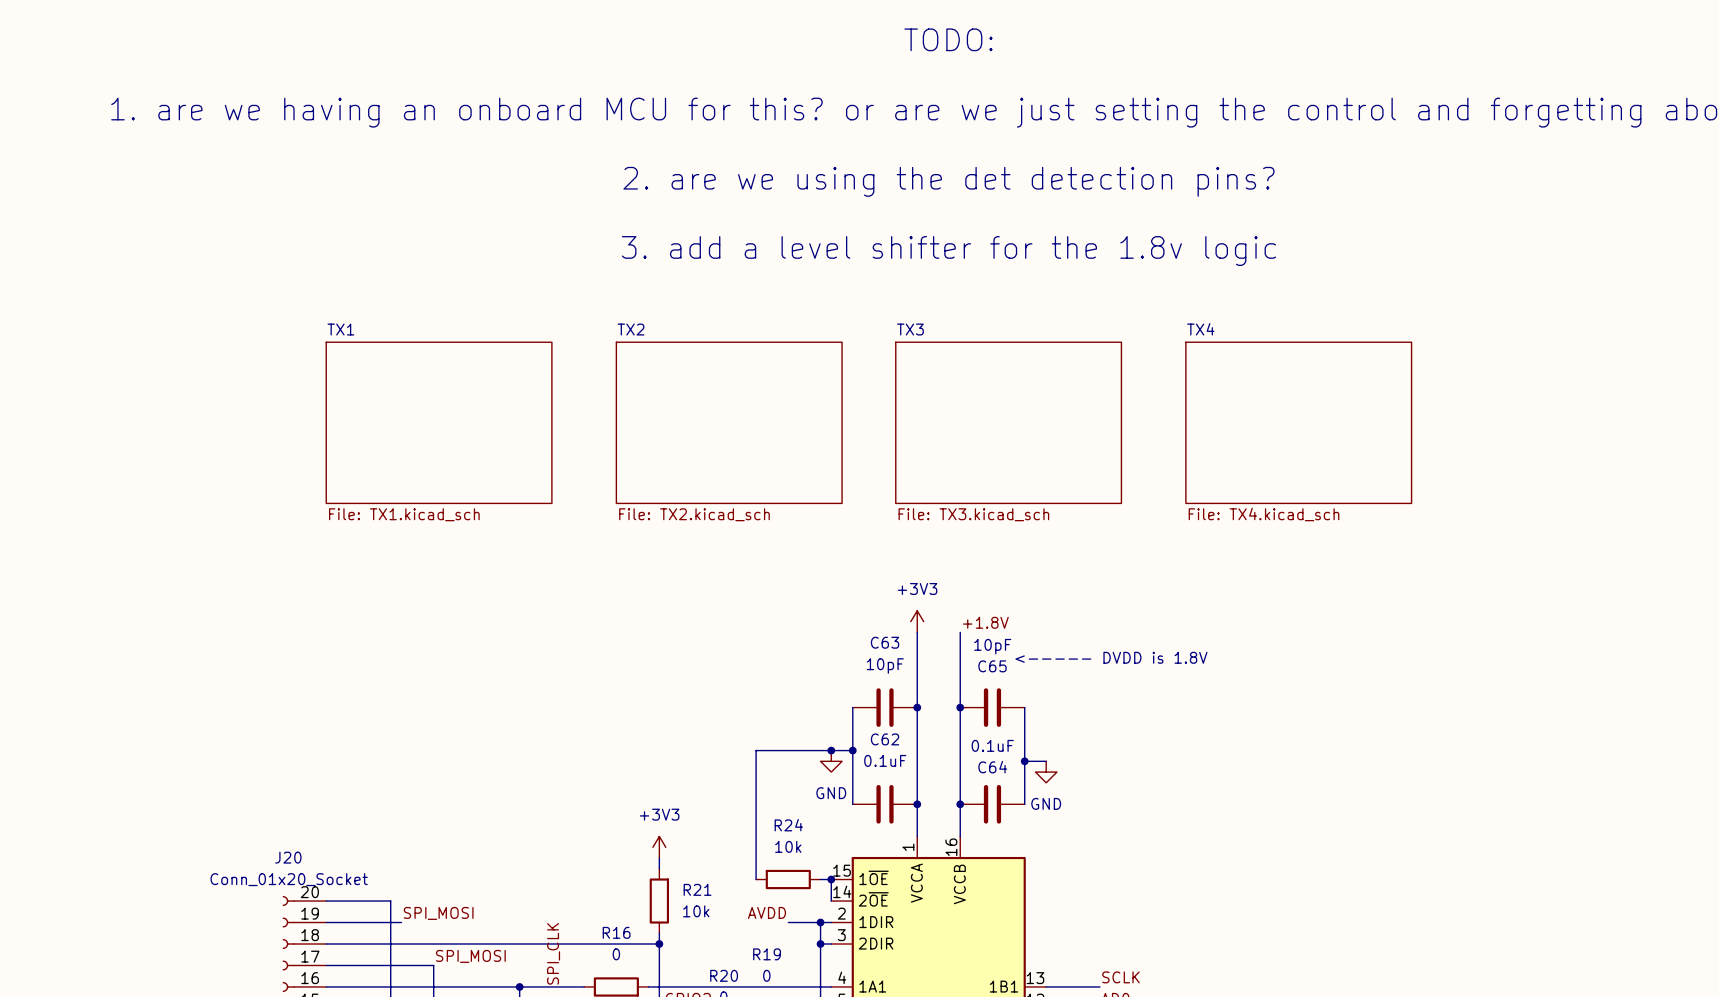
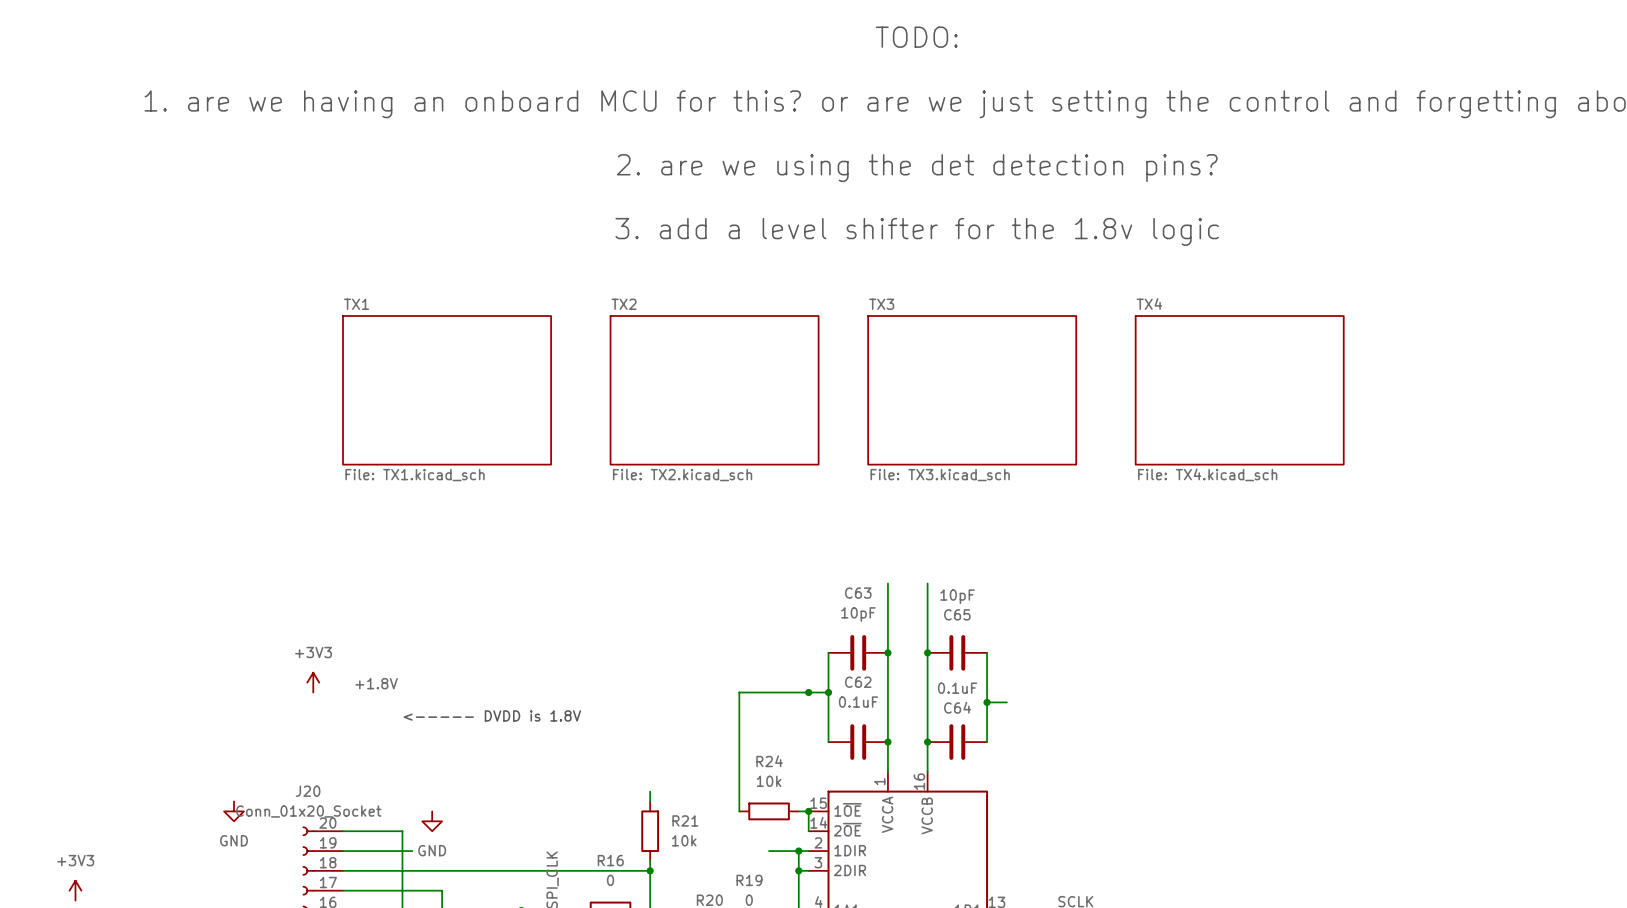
power symbol: +3V3 (917, 621) -> none
label: +1.8V (985, 622) -> none
text: <----- DVDD is 1.8V (1111, 657) -> none
power symbol: none -> +3V3 (313, 682)
label: none -> +1.8V (376, 683)
power symbol: GND (831, 761) -> none
power symbol: GND (1046, 772) -> none
text: none -> <----- DVDD is 1.8V (492, 715)
power symbol: +3V3 (659, 847) -> none
power symbol: none -> GND (234, 811)
power symbol: none -> GND (432, 821)
label: AVDD (766, 912) -> none
label: SPI_MOSI (438, 913) -> none
label: SPI_MOSI (470, 956) -> none
power symbol: none -> +3V3 (75, 890)

